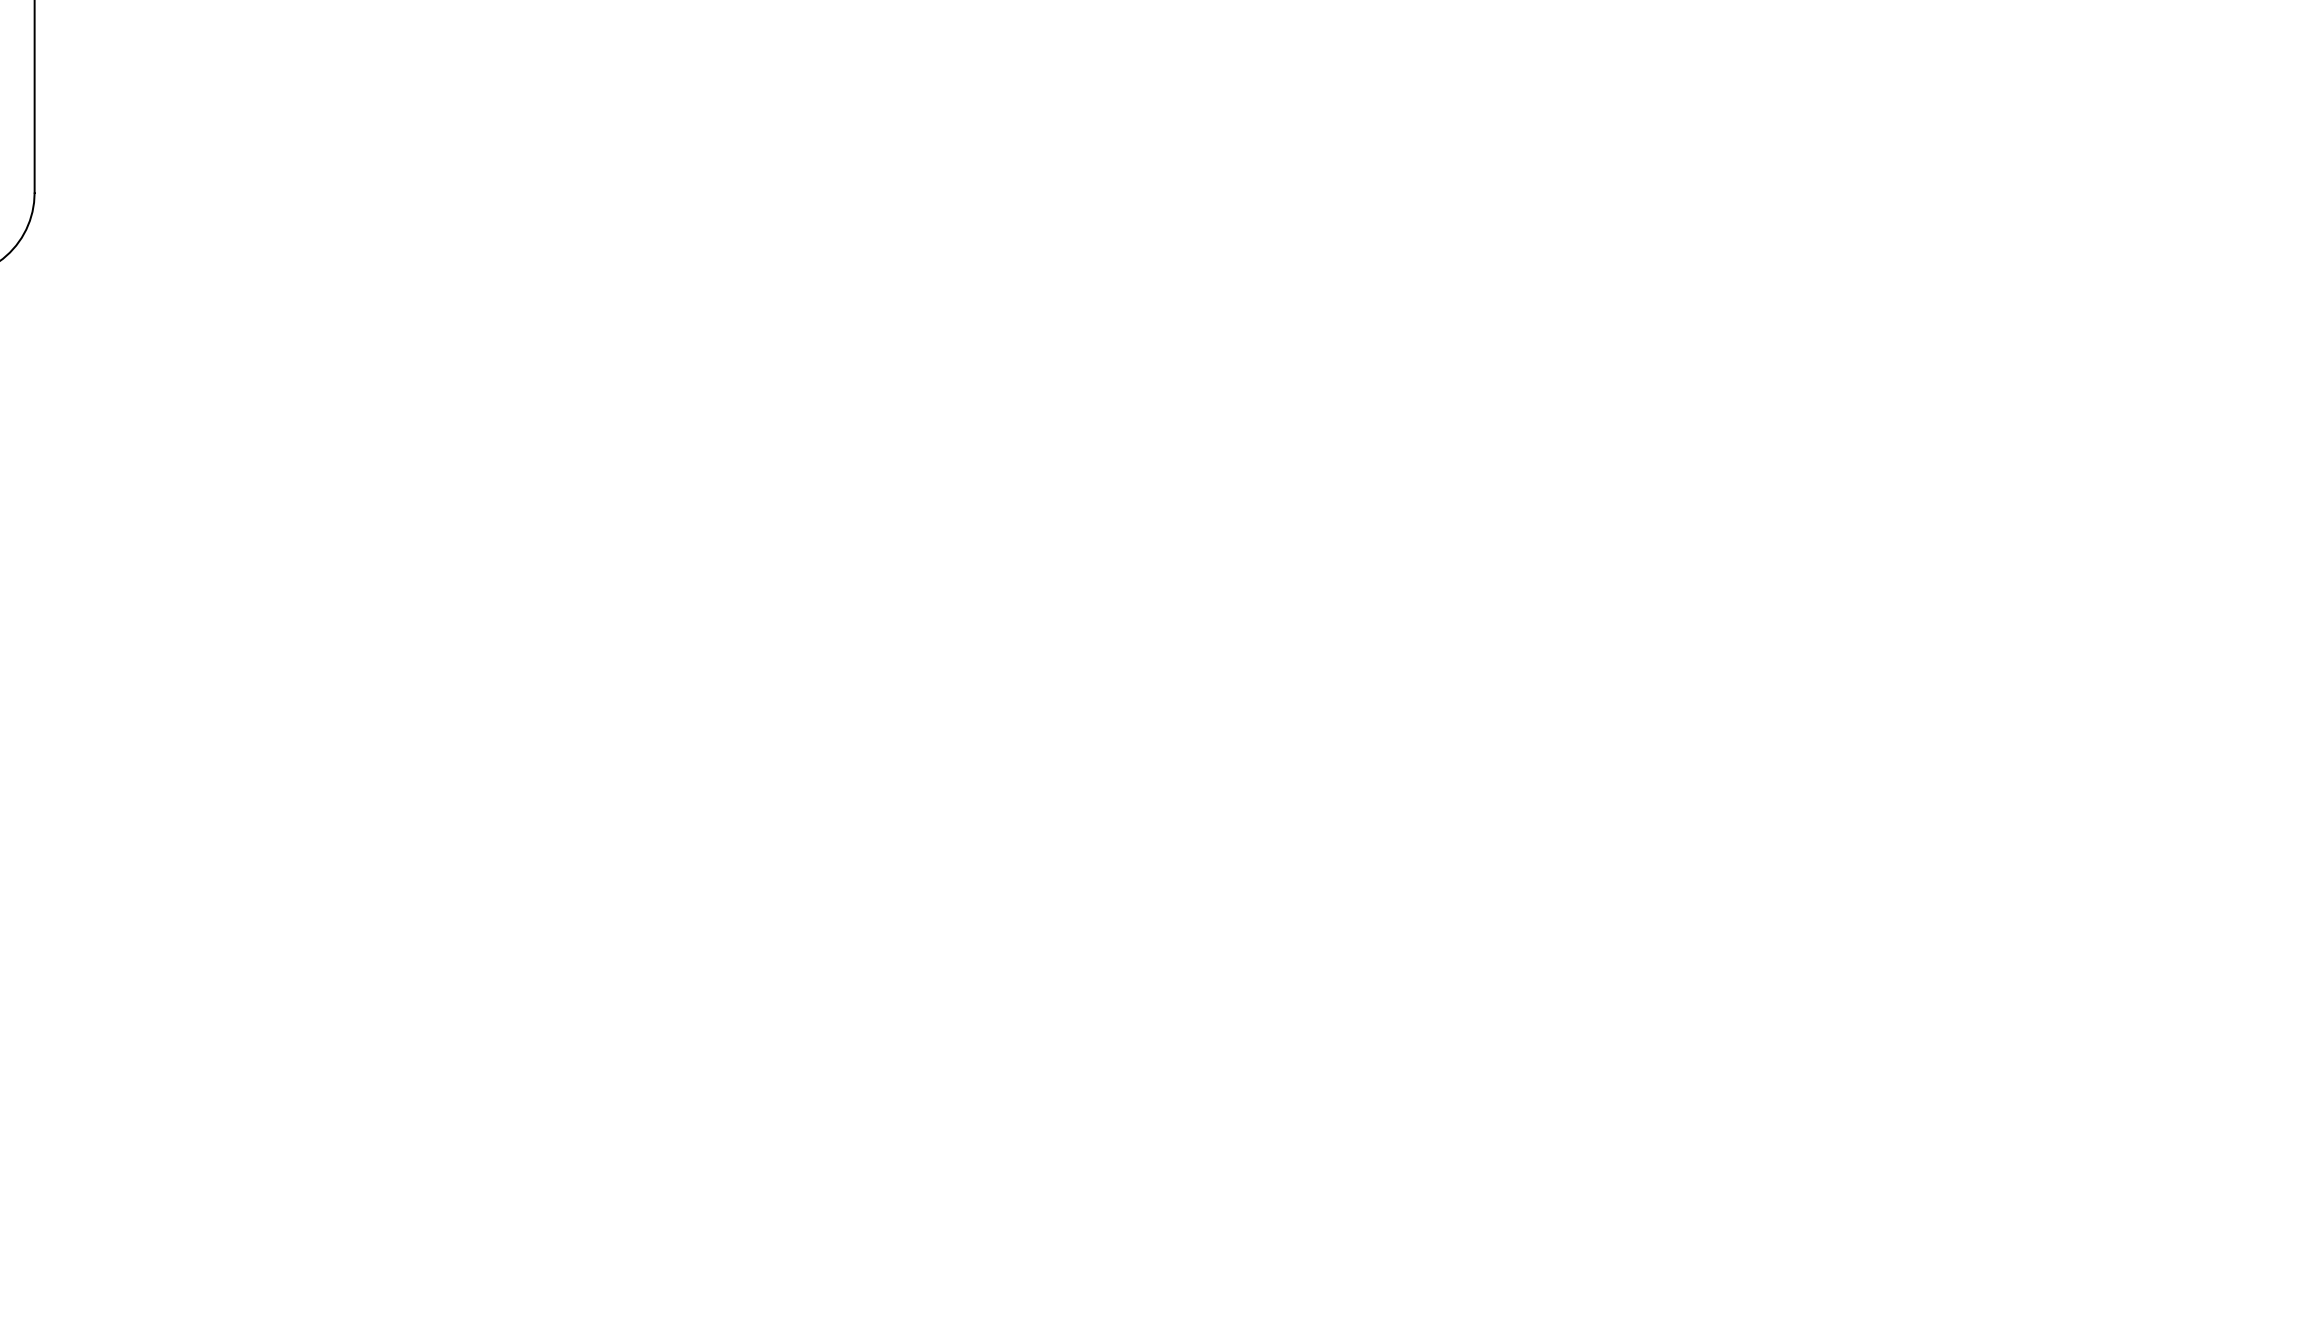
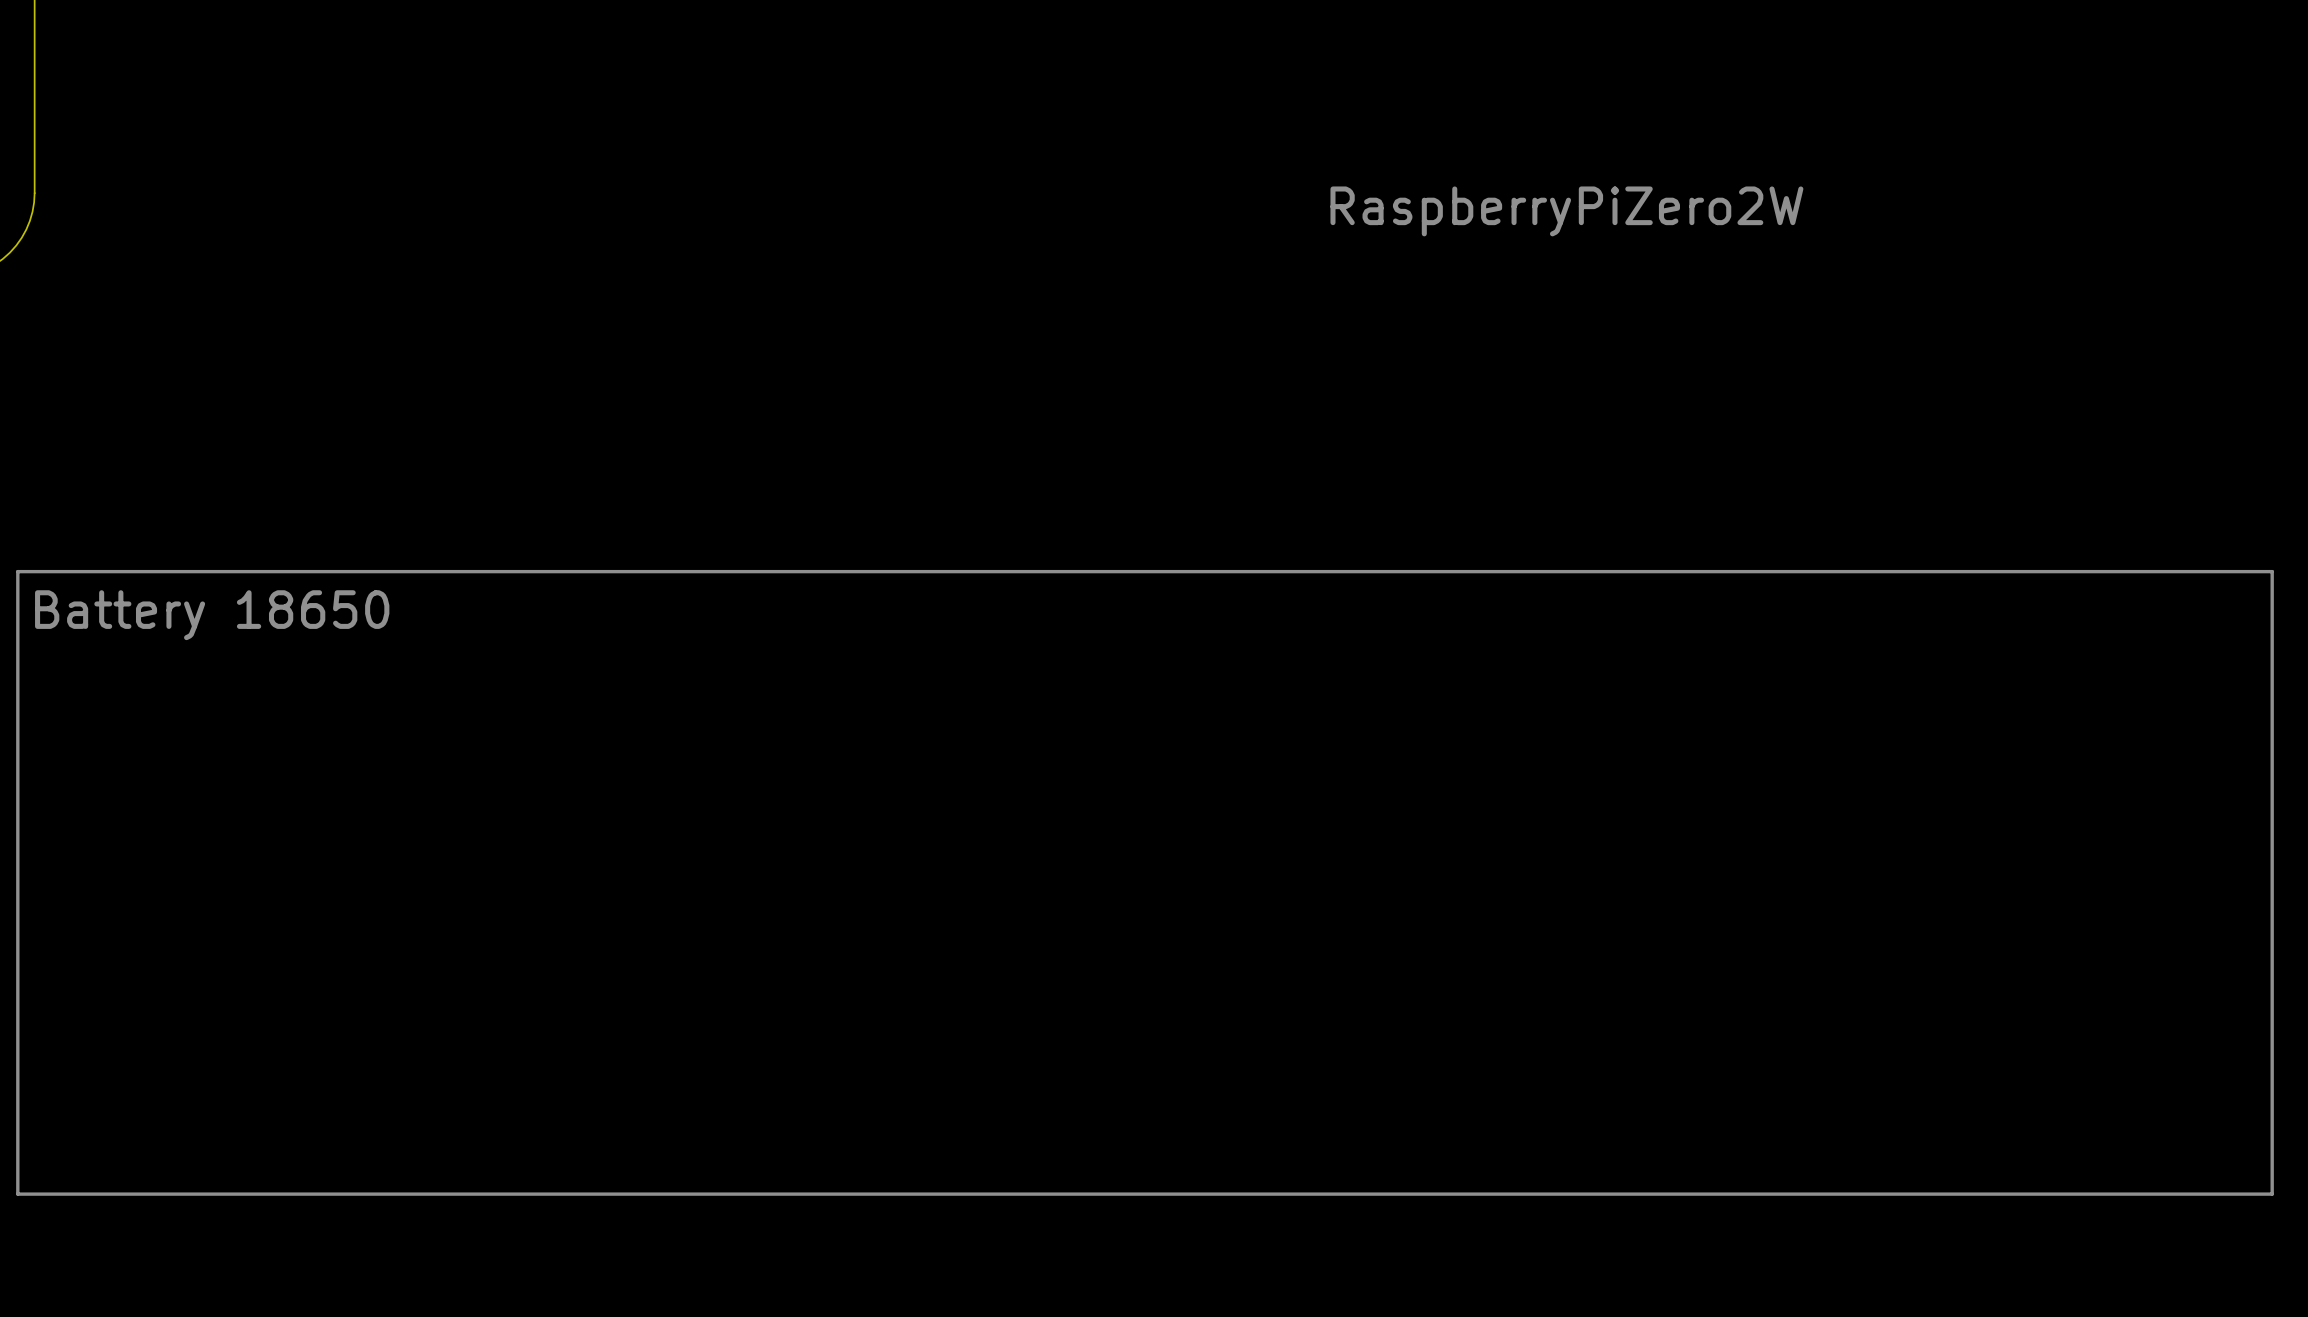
text: none -> RaspberryPiZero2W (1566, 211)
line: none -> (17, 571) (17, 1194) (2272, 1194) (2272, 571) (17, 571)
text: none -> Battery 18650 (212, 615)

